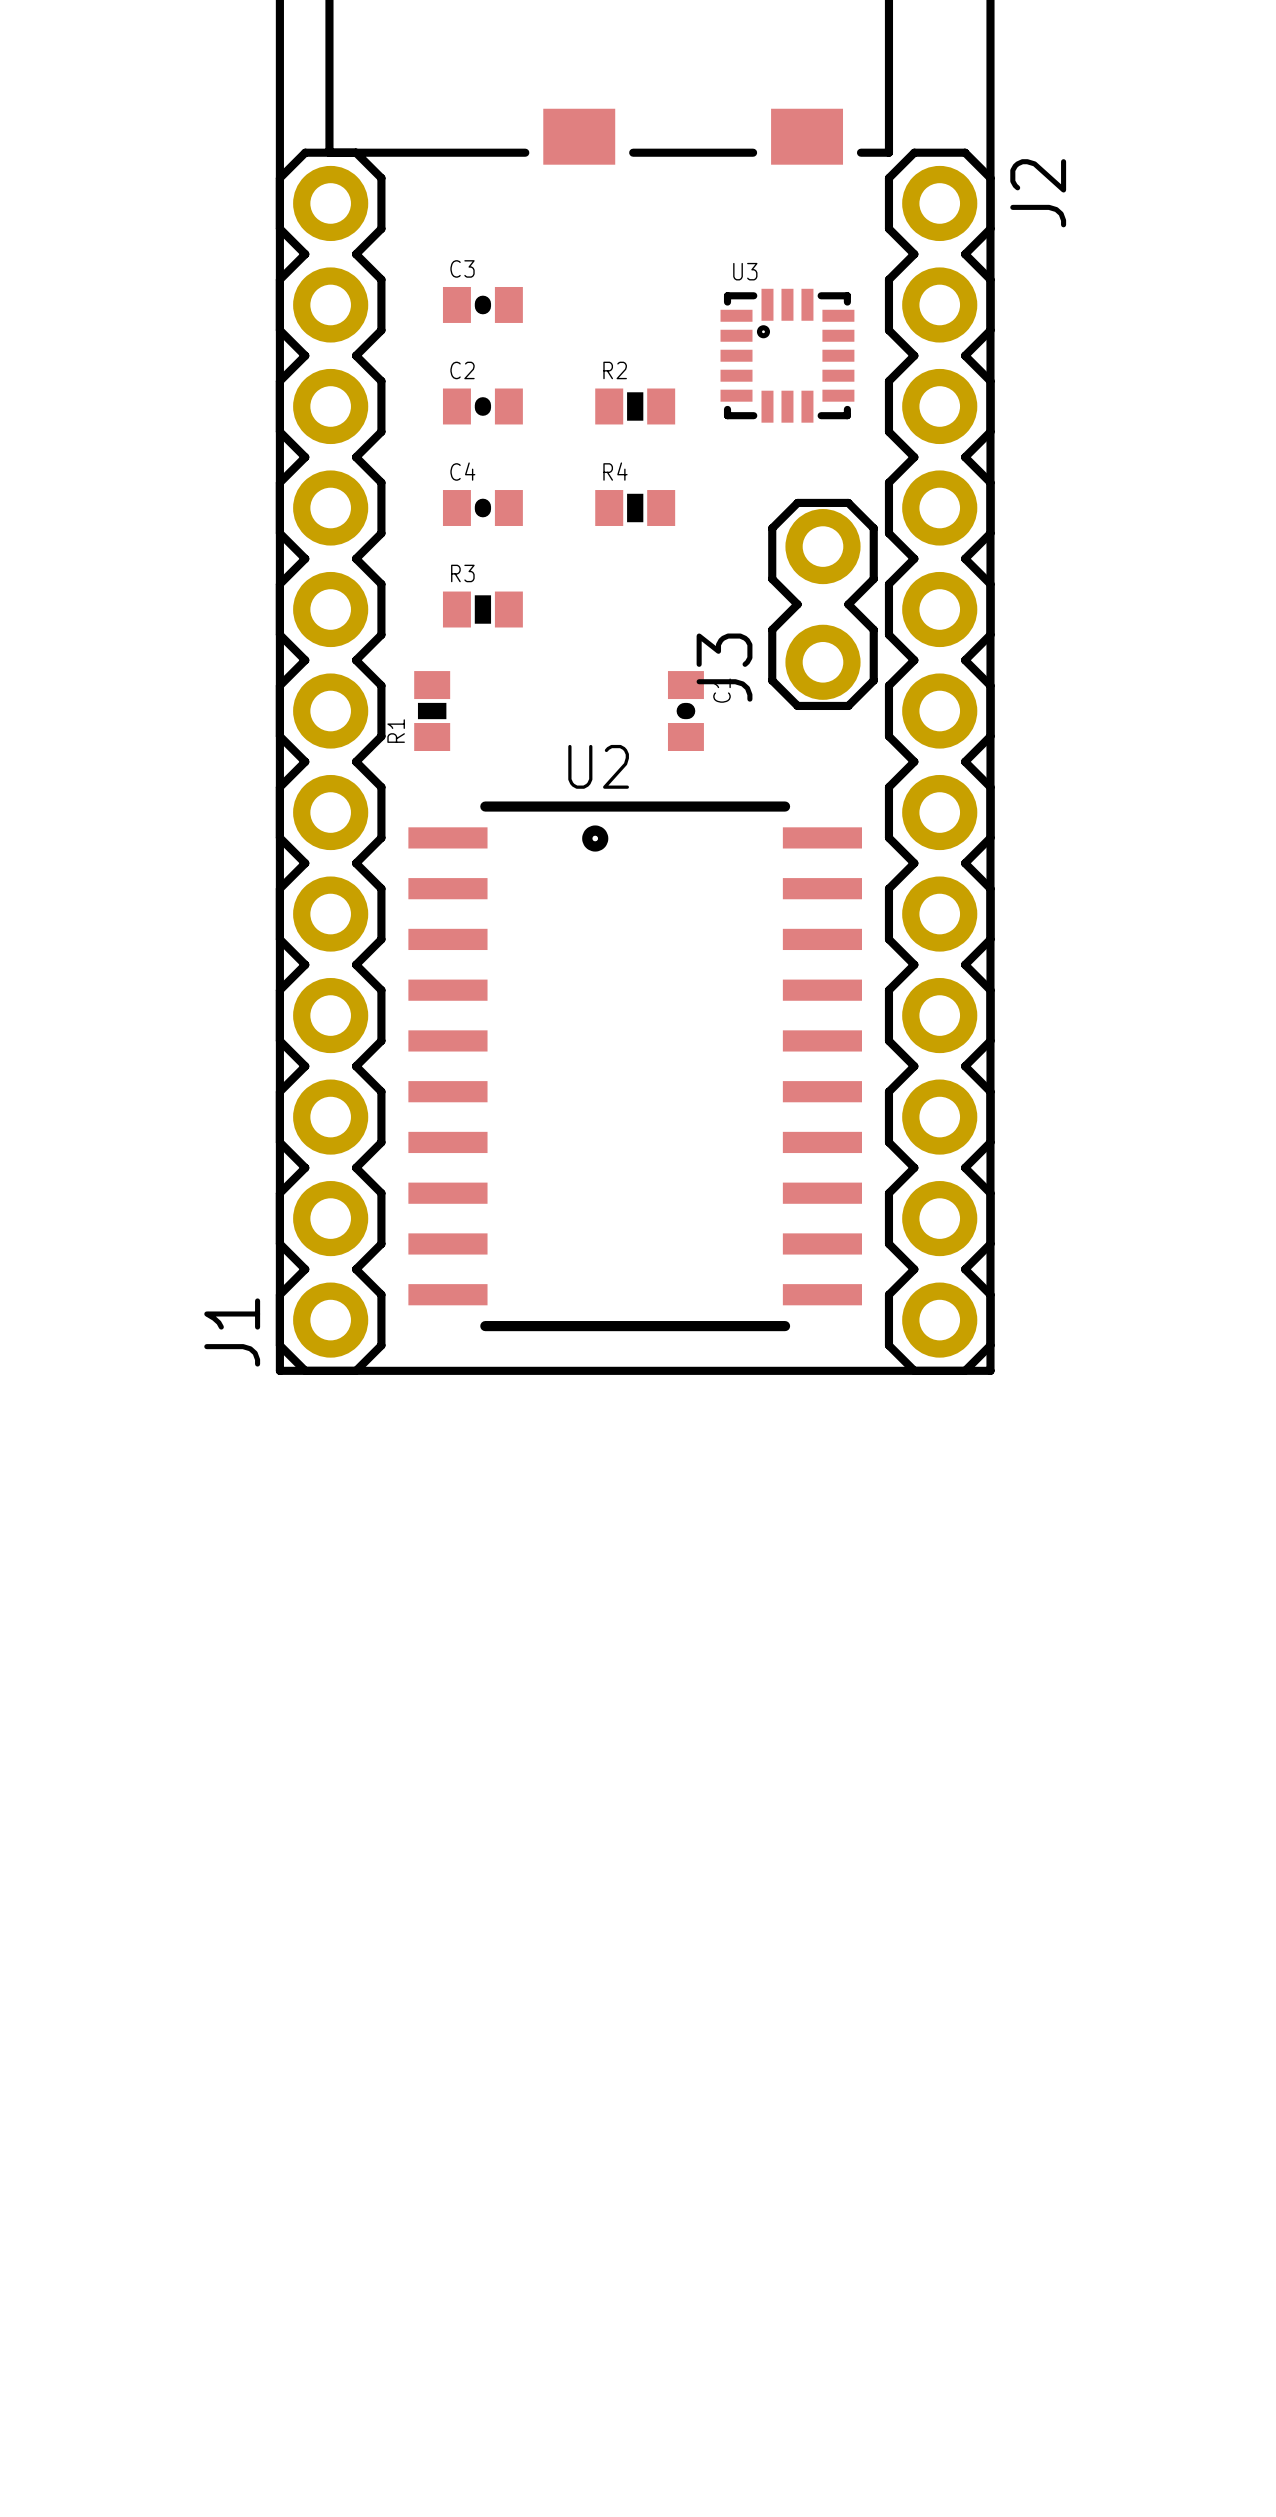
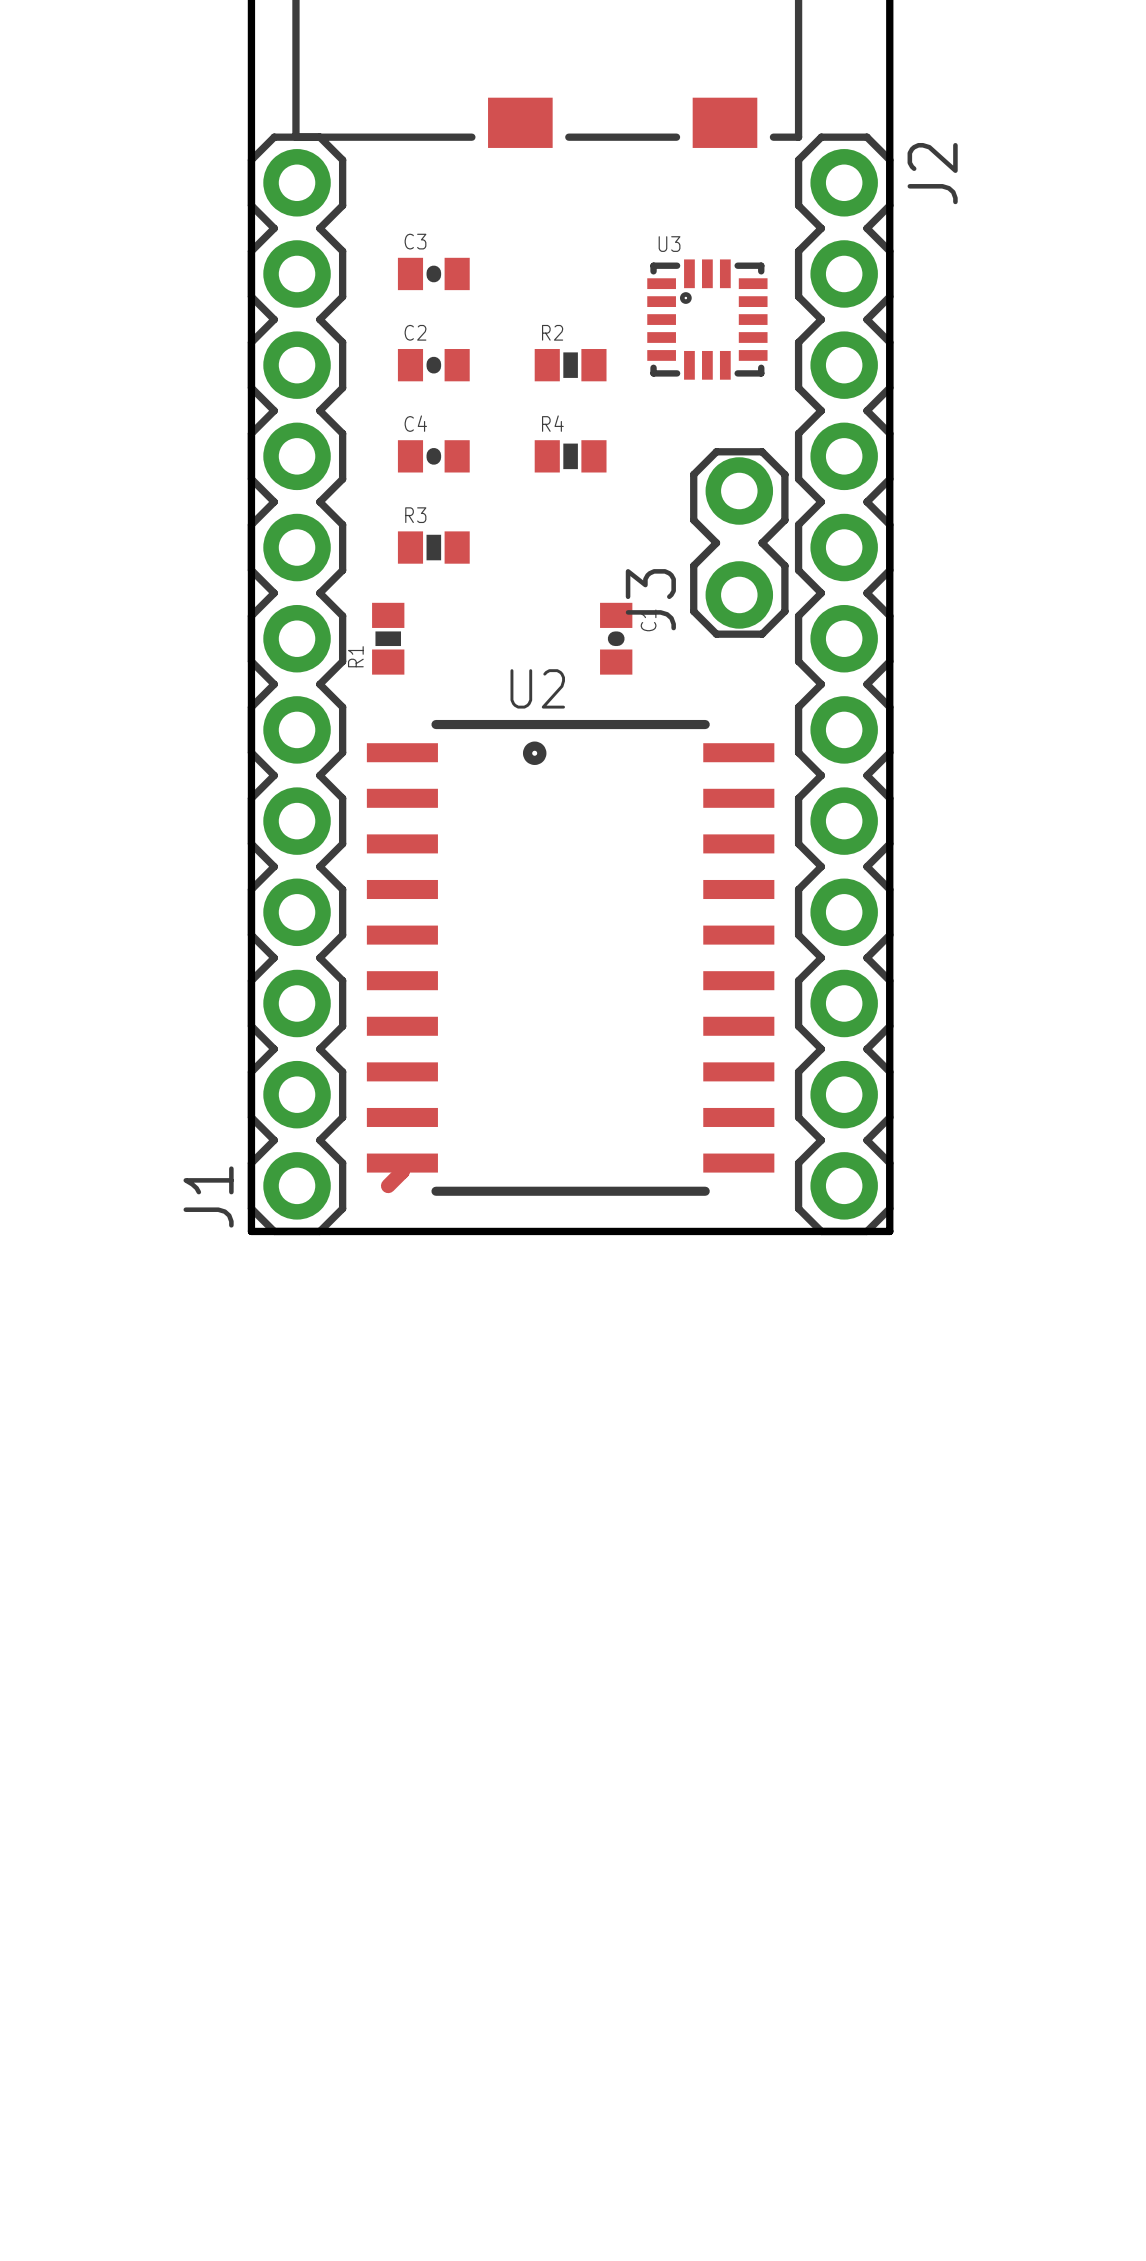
track: none -> (402, 1163) (402, 1171) (388, 1185)

